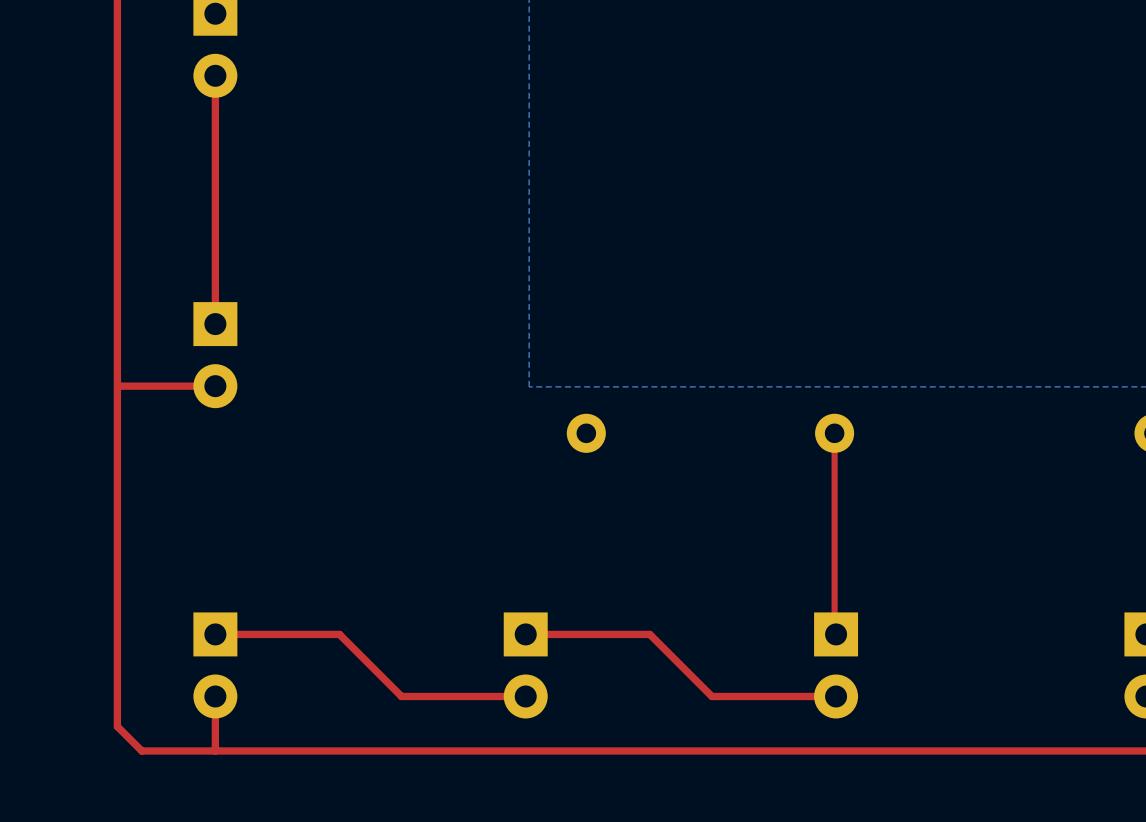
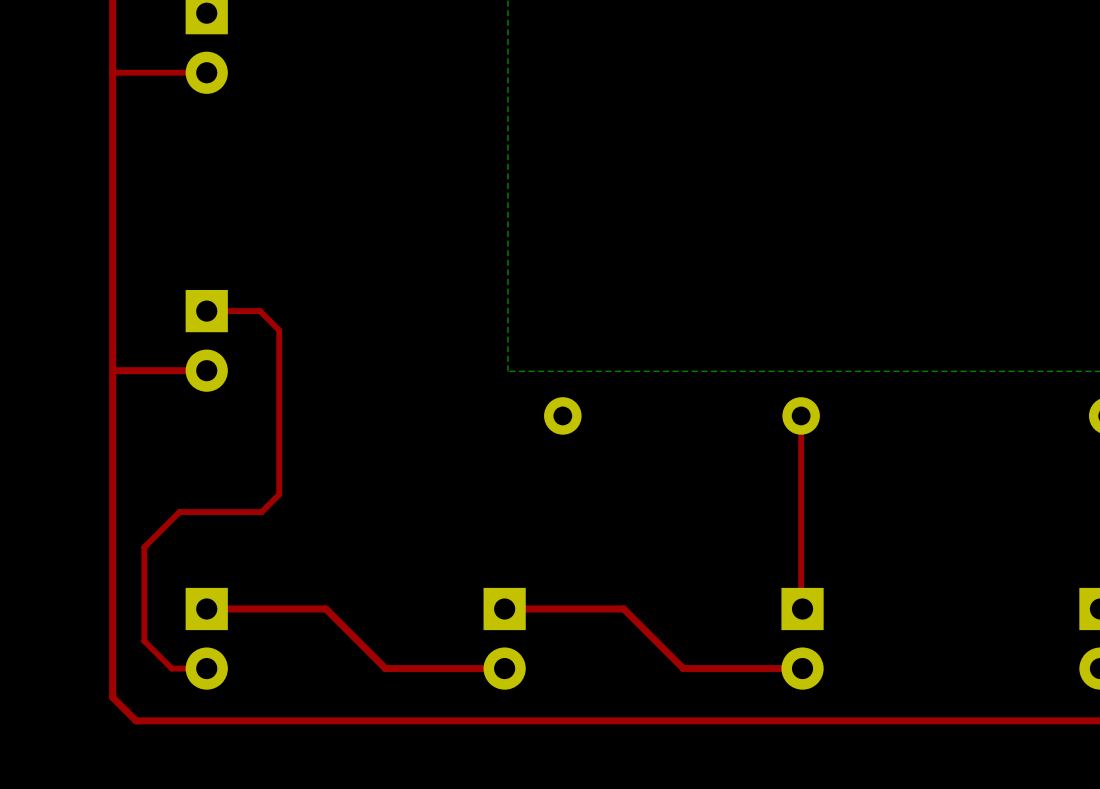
top track: (215, 75) (215, 324) -> (206, 72) (112, 72)
top track: (215, 696) (215, 750) -> (206, 668) (171, 668) (144, 641) (144, 547) (179, 512) (261, 512) (279, 494) (279, 330) (259, 311) (206, 311)

